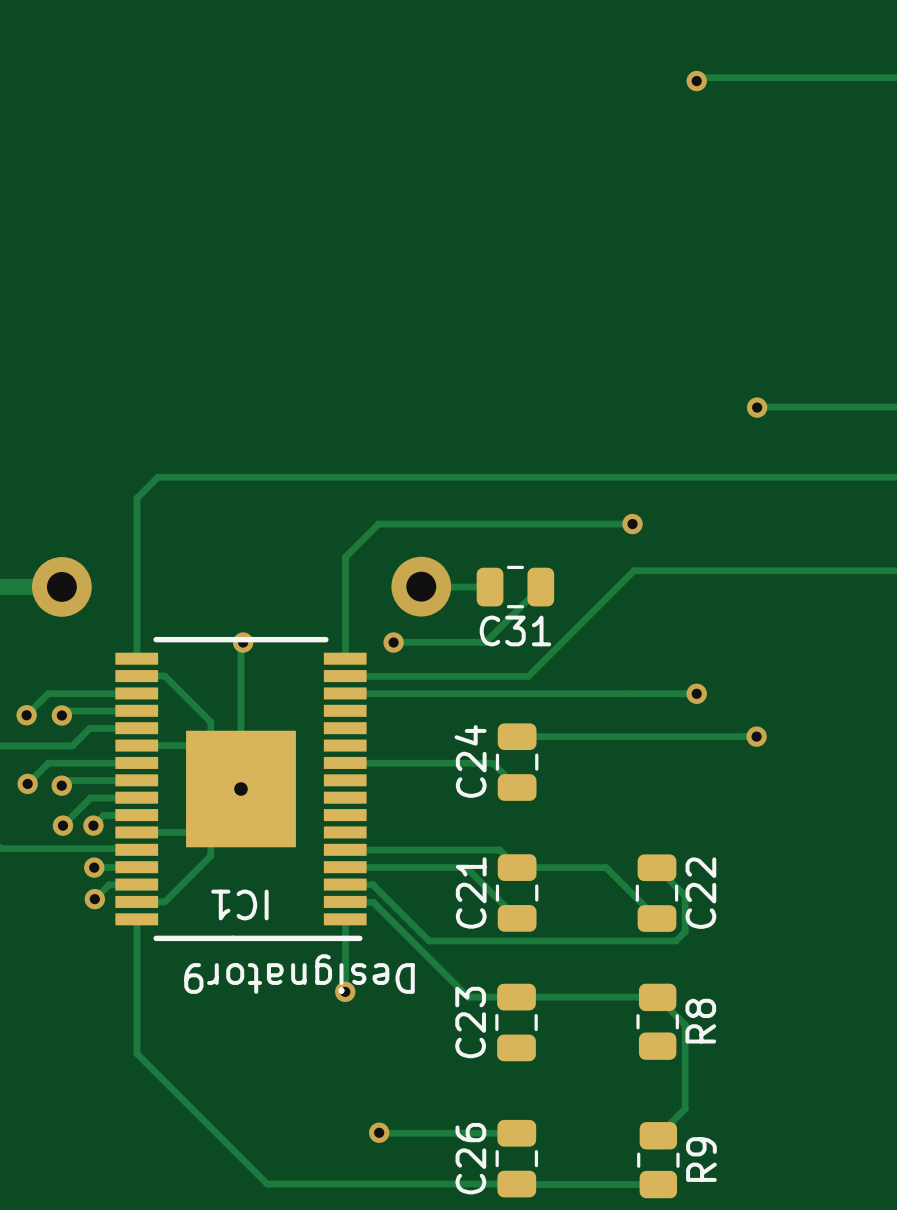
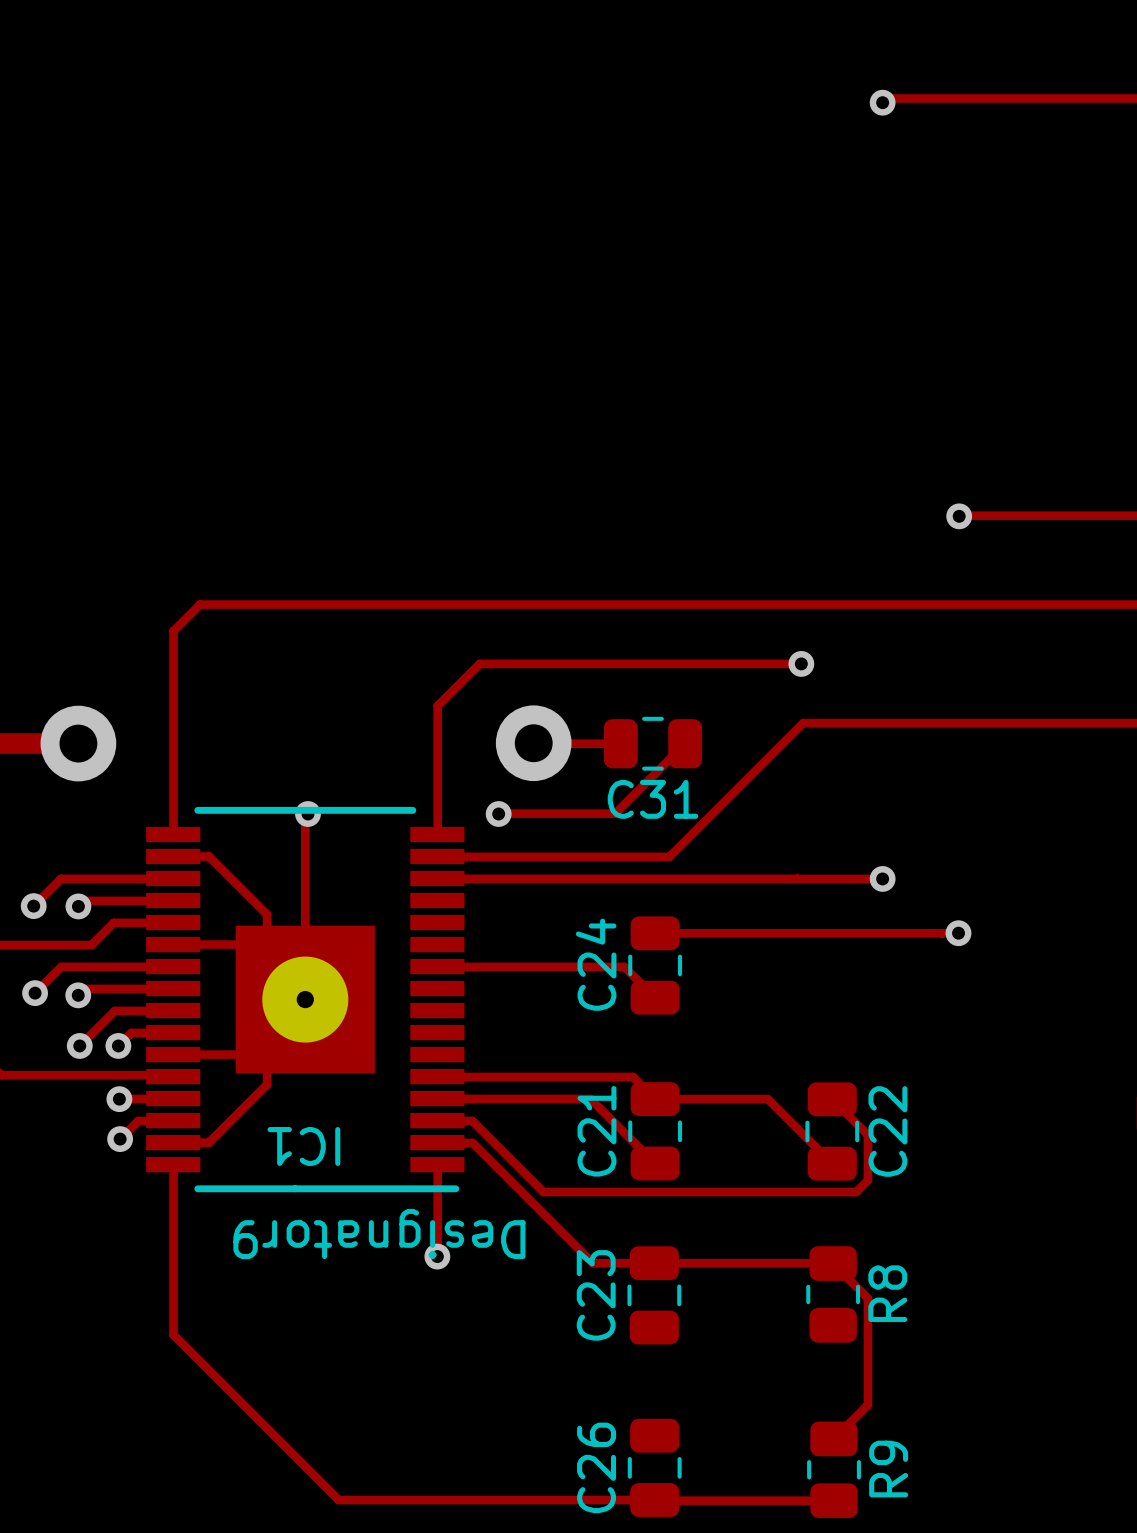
track: (379, 1132) (516, 1133) -> none
via: (379, 1132) -> none

